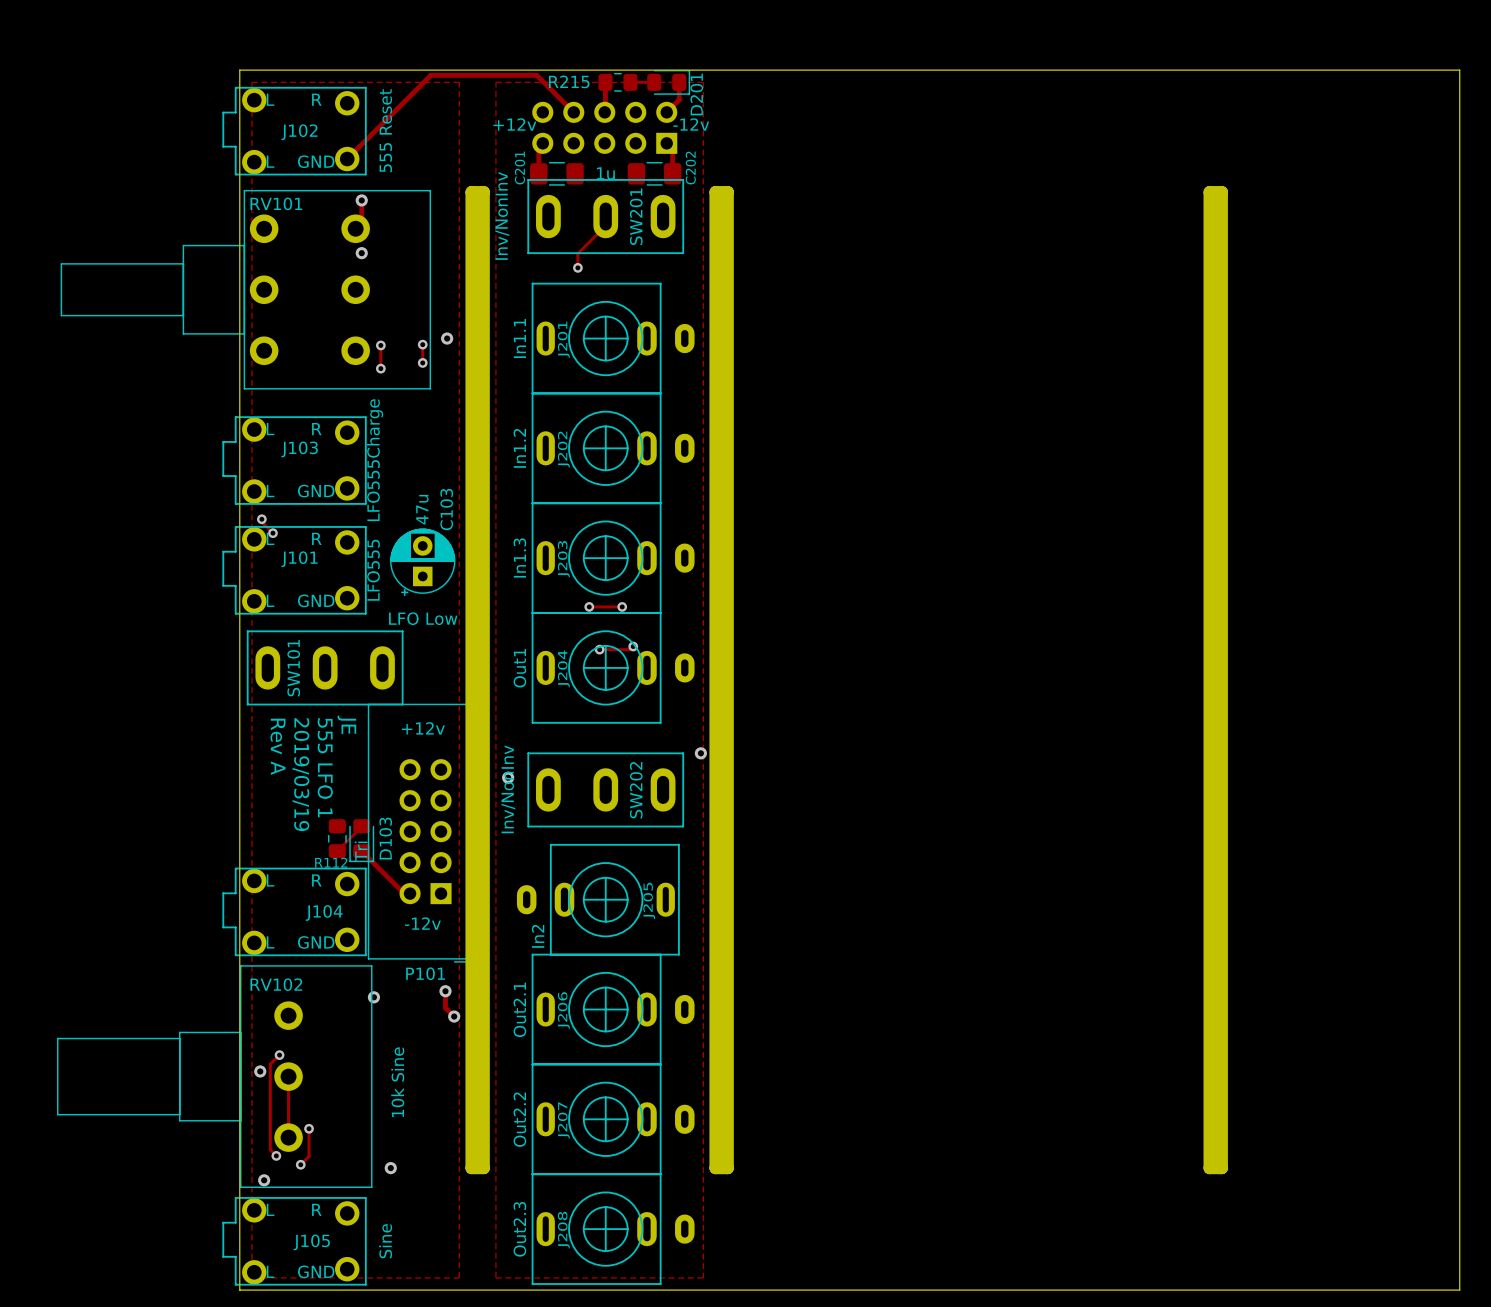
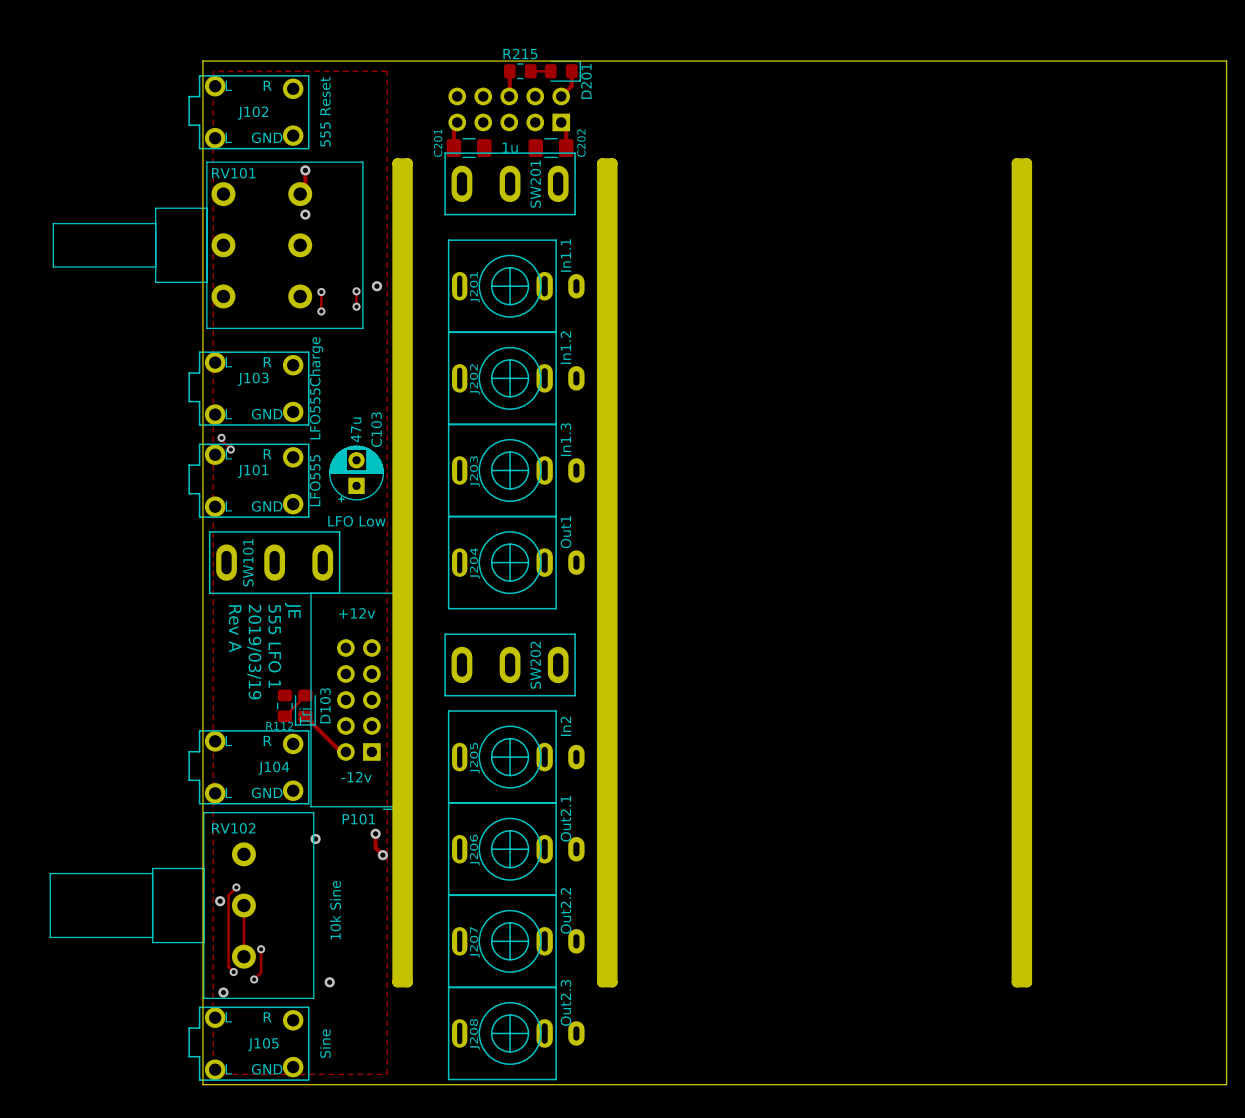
R215 name position: R215 (569, 81) -> R215 (520, 54)
zone outline: (495, 82) (703, 82) (703, 1277) (495, 1277) (495, 82) -> none
track: (573, 112) (536, 75) (430, 75) (347, 159) -> none
text: +12v (514, 124) -> none
text: -12v (691, 124) -> none
SW201 value: Inv/NonInv (502, 215) -> none
track: (605, 216) (605, 225) (577, 253) (577, 267) -> none
via: (577, 267) -> none
J201 value position: In1.1 (519, 338) -> In1.1 (565, 255)
J202 value position: In1.2 (519, 448) -> In1.2 (565, 347)
J203 value position: In1.3 (519, 557) -> In1.3 (565, 439)
track: (589, 606) (622, 606) -> none
via: (589, 606) -> none
via: (622, 606) -> none
track: (633, 646) (630, 649) (599, 649) -> none
via: (633, 646) -> none
via: (599, 649) -> none
J204 value position: Out1 (519, 668) -> Out1 (565, 532)
via: (700, 753) -> none
via: (508, 777) -> none
SW202 value: Inv/NonInv (508, 789) -> none
J205 rotation: 0° (598, 899) -> 180° (516, 757)
J206 value position: Out2.1 (519, 1009) -> Out2.1 (565, 818)
J207 value position: Out2.2 (519, 1119) -> Out2.2 (565, 910)
J208 value position: Out2.3 (519, 1229) -> Out2.3 (565, 1002)

